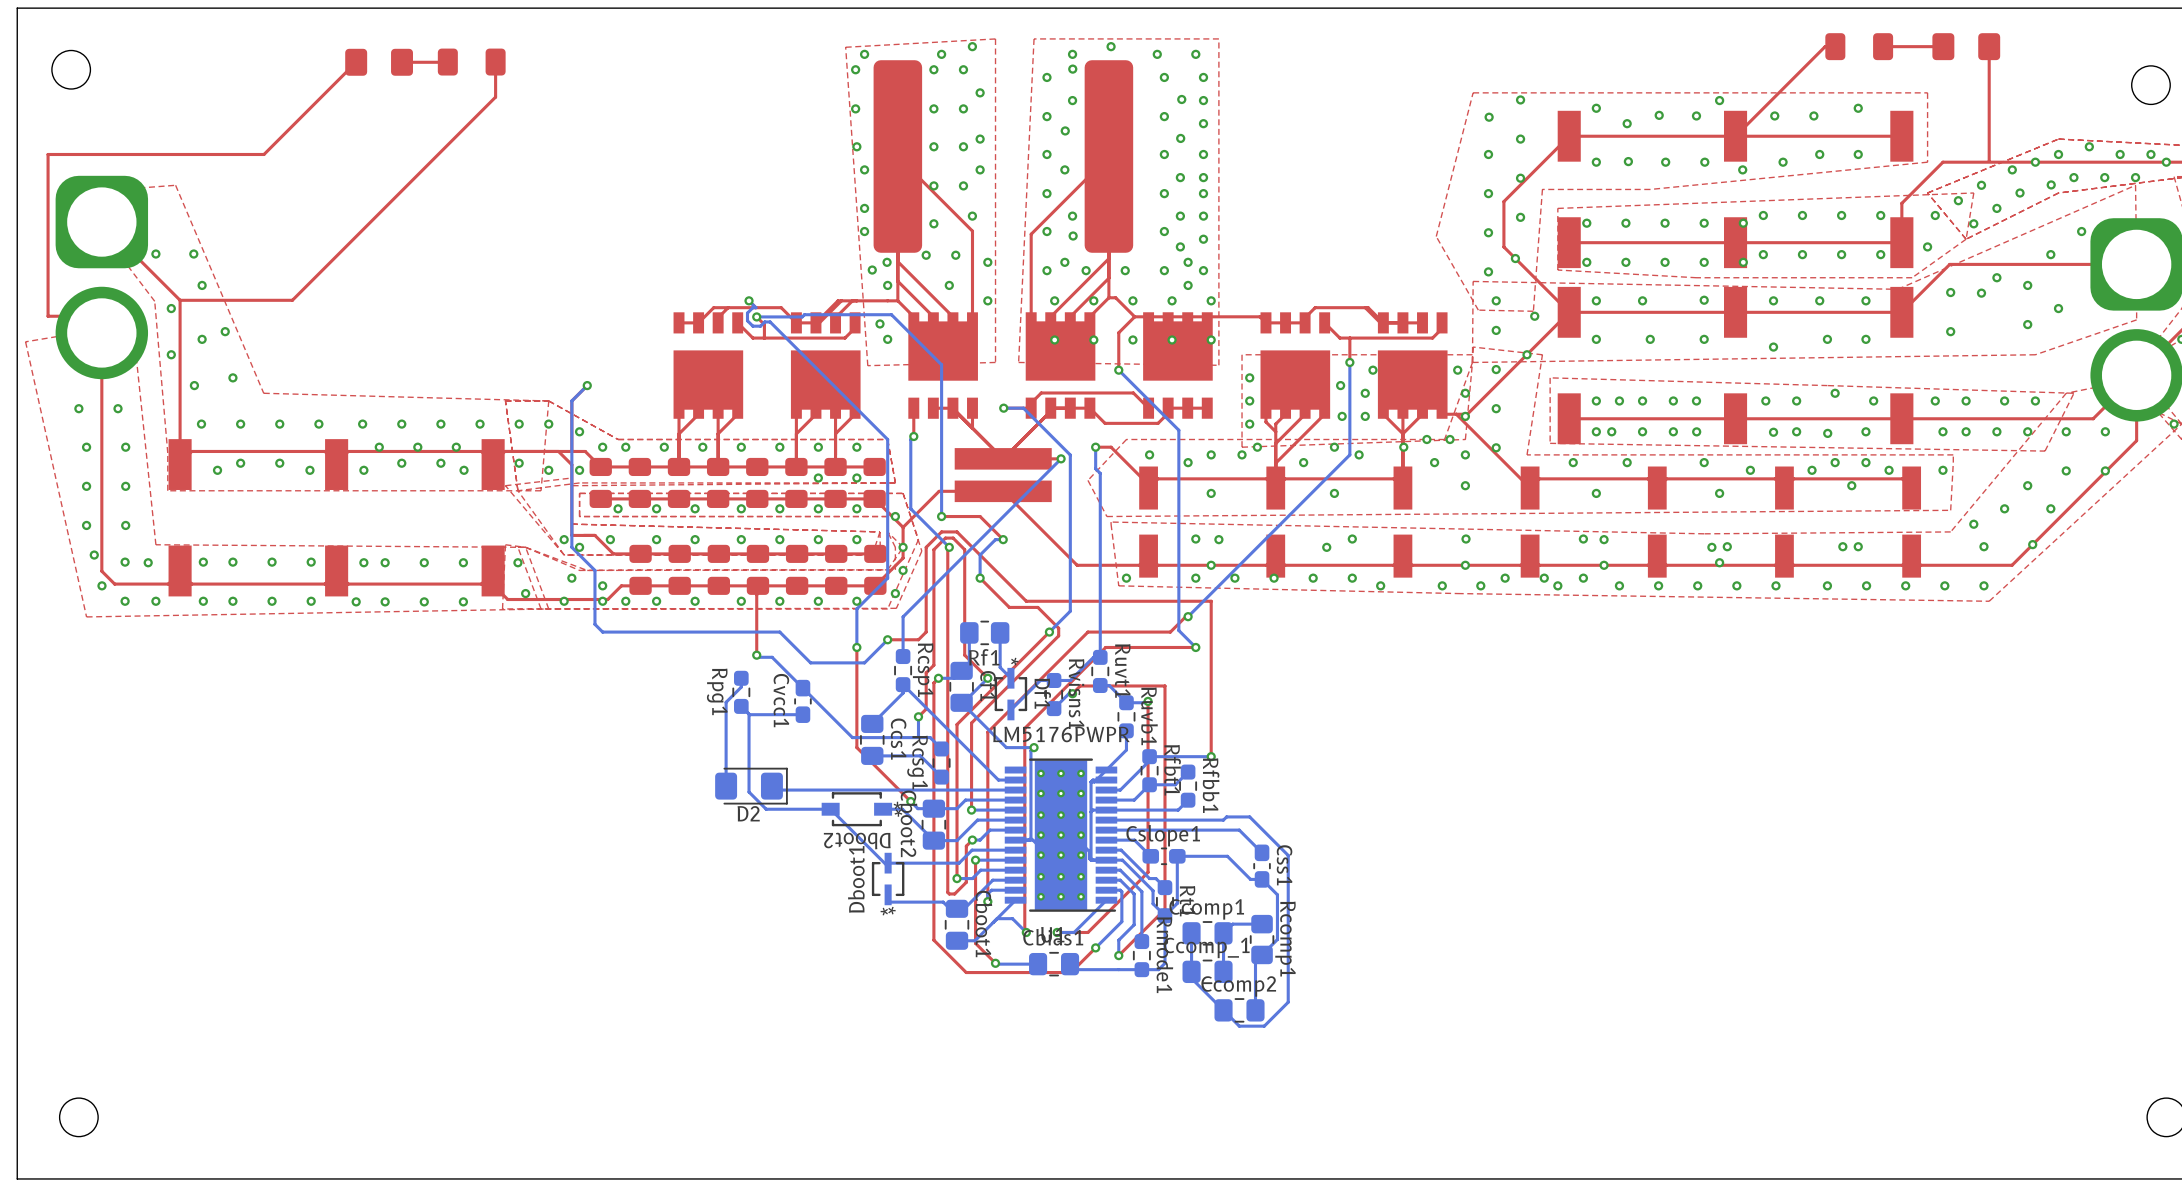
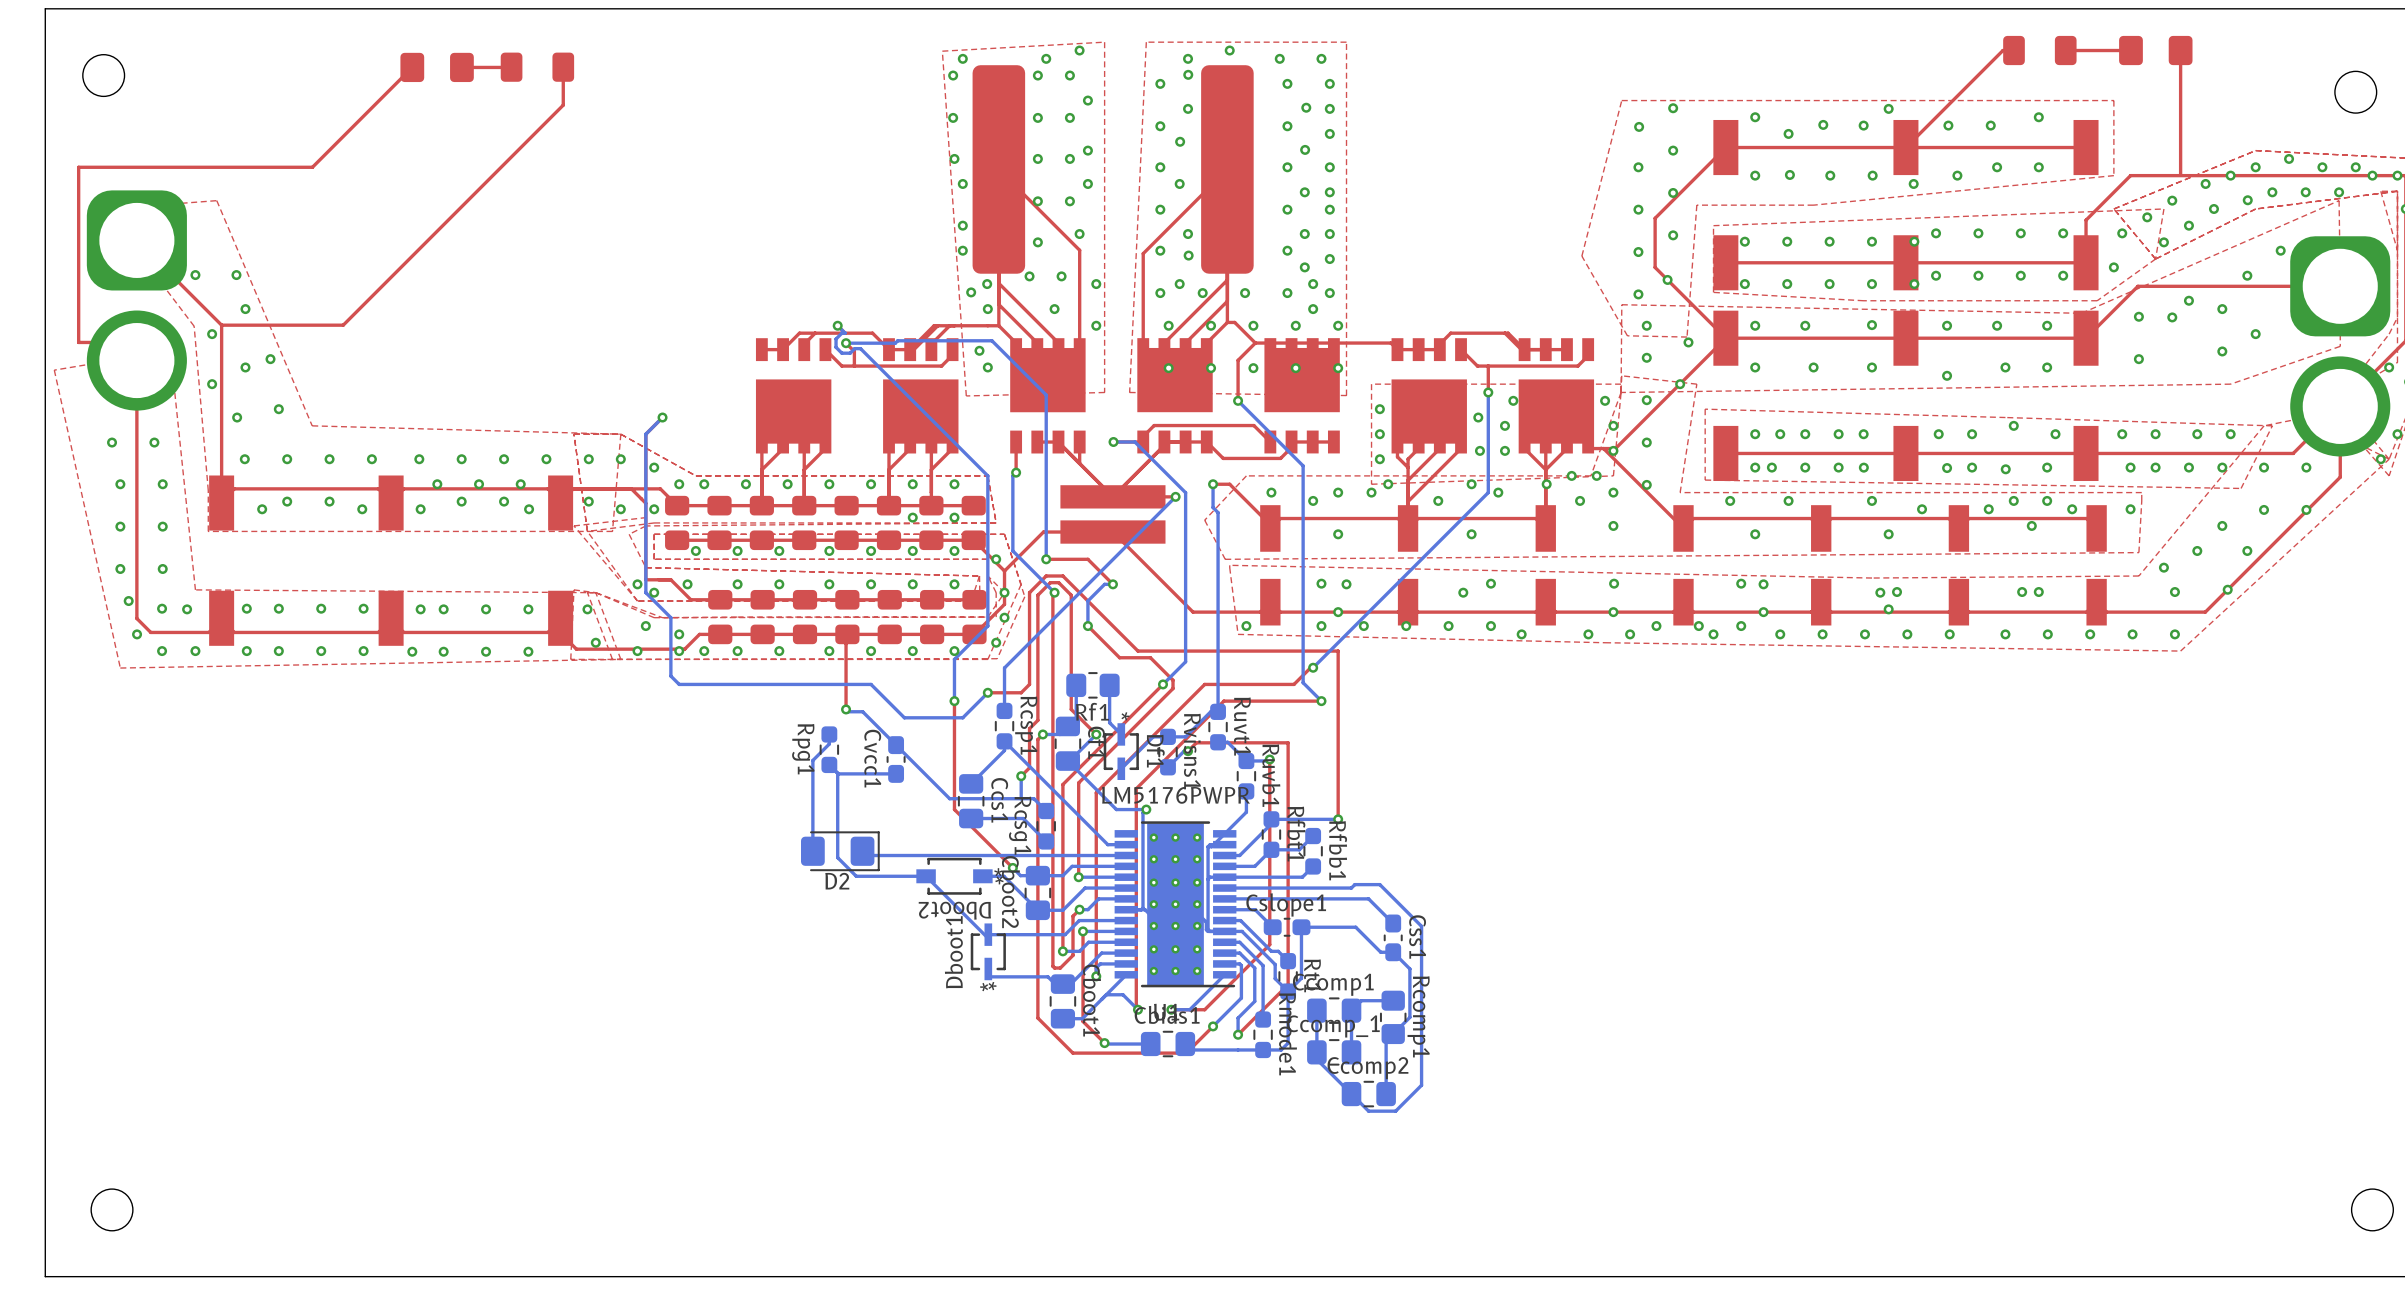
top zone outline: (571, 524) (879, 531) -> (645, 567) (629, 534) (645, 525)

